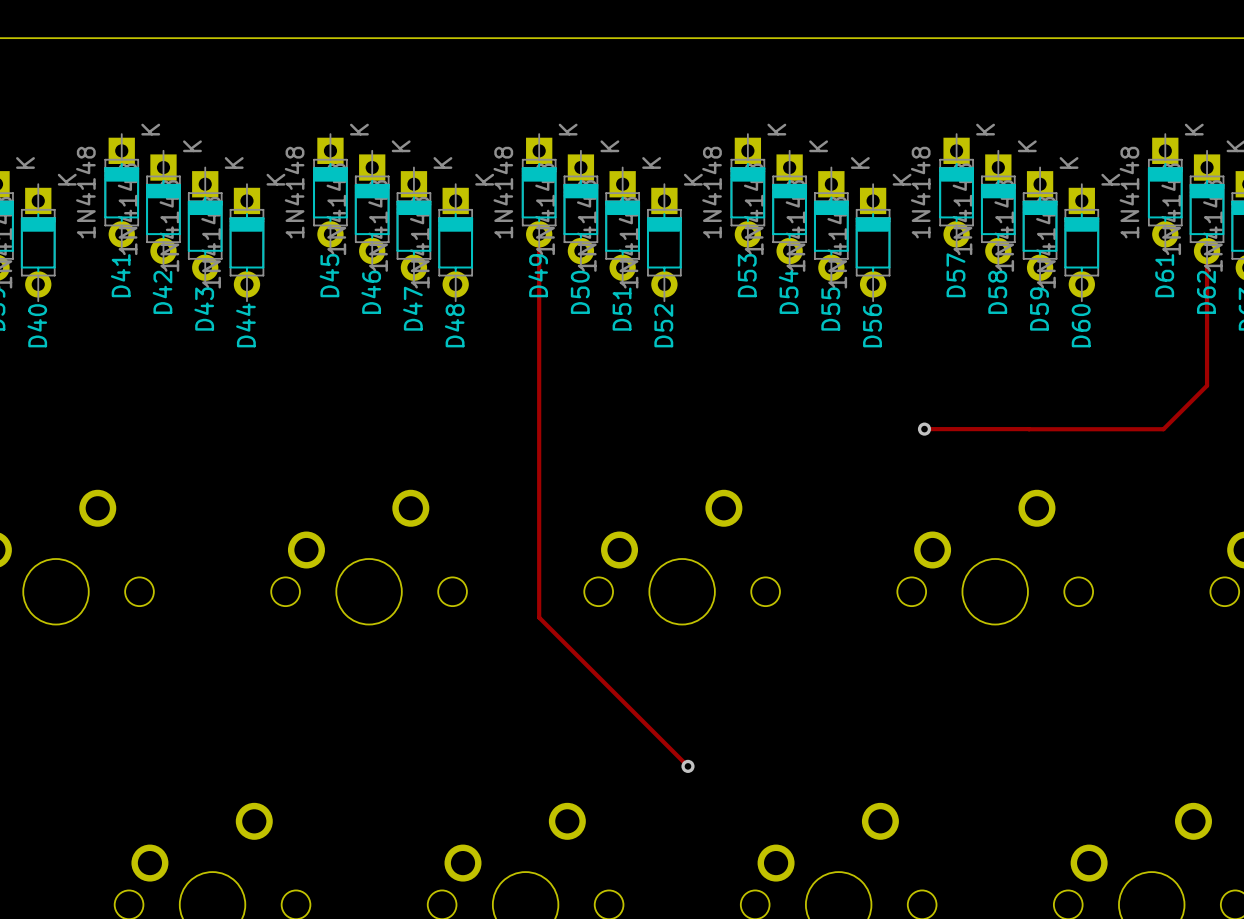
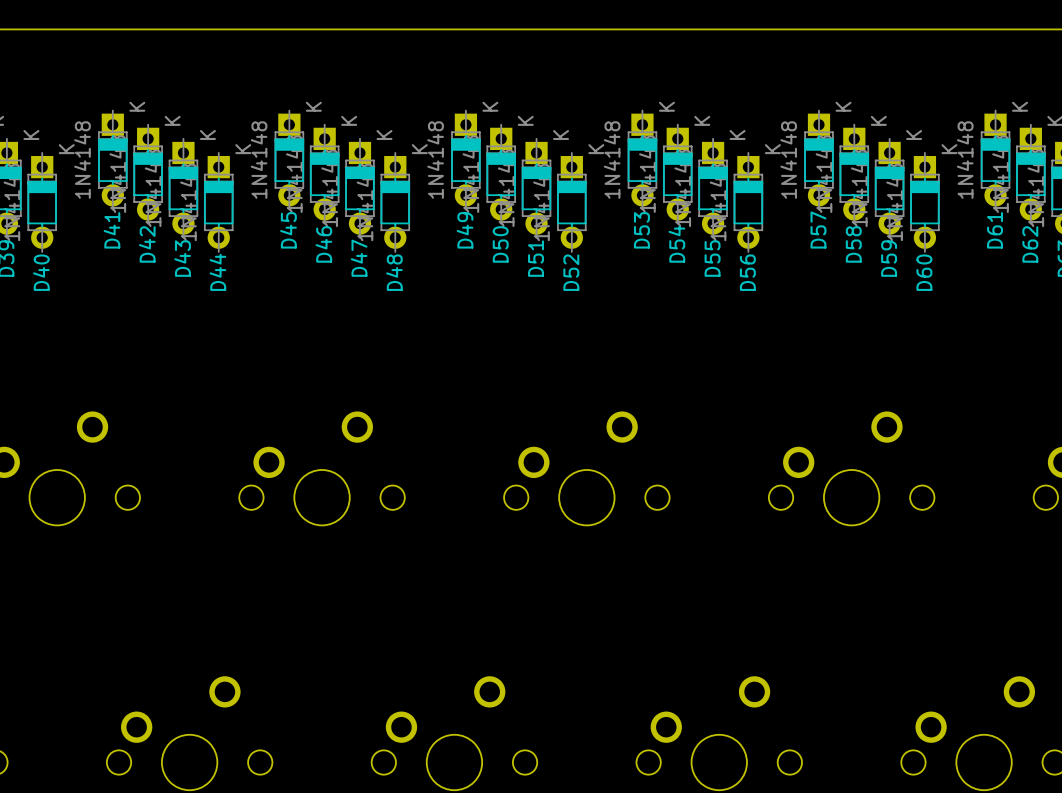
track: (539, 234) (539, 617) (687, 766) -> none
track: (1207, 251) (1207, 385) (1163, 429) (1029, 429) -> none
track: (924, 429) (1028, 429) -> none
via: (924, 429) -> none
via: (687, 766) -> none

